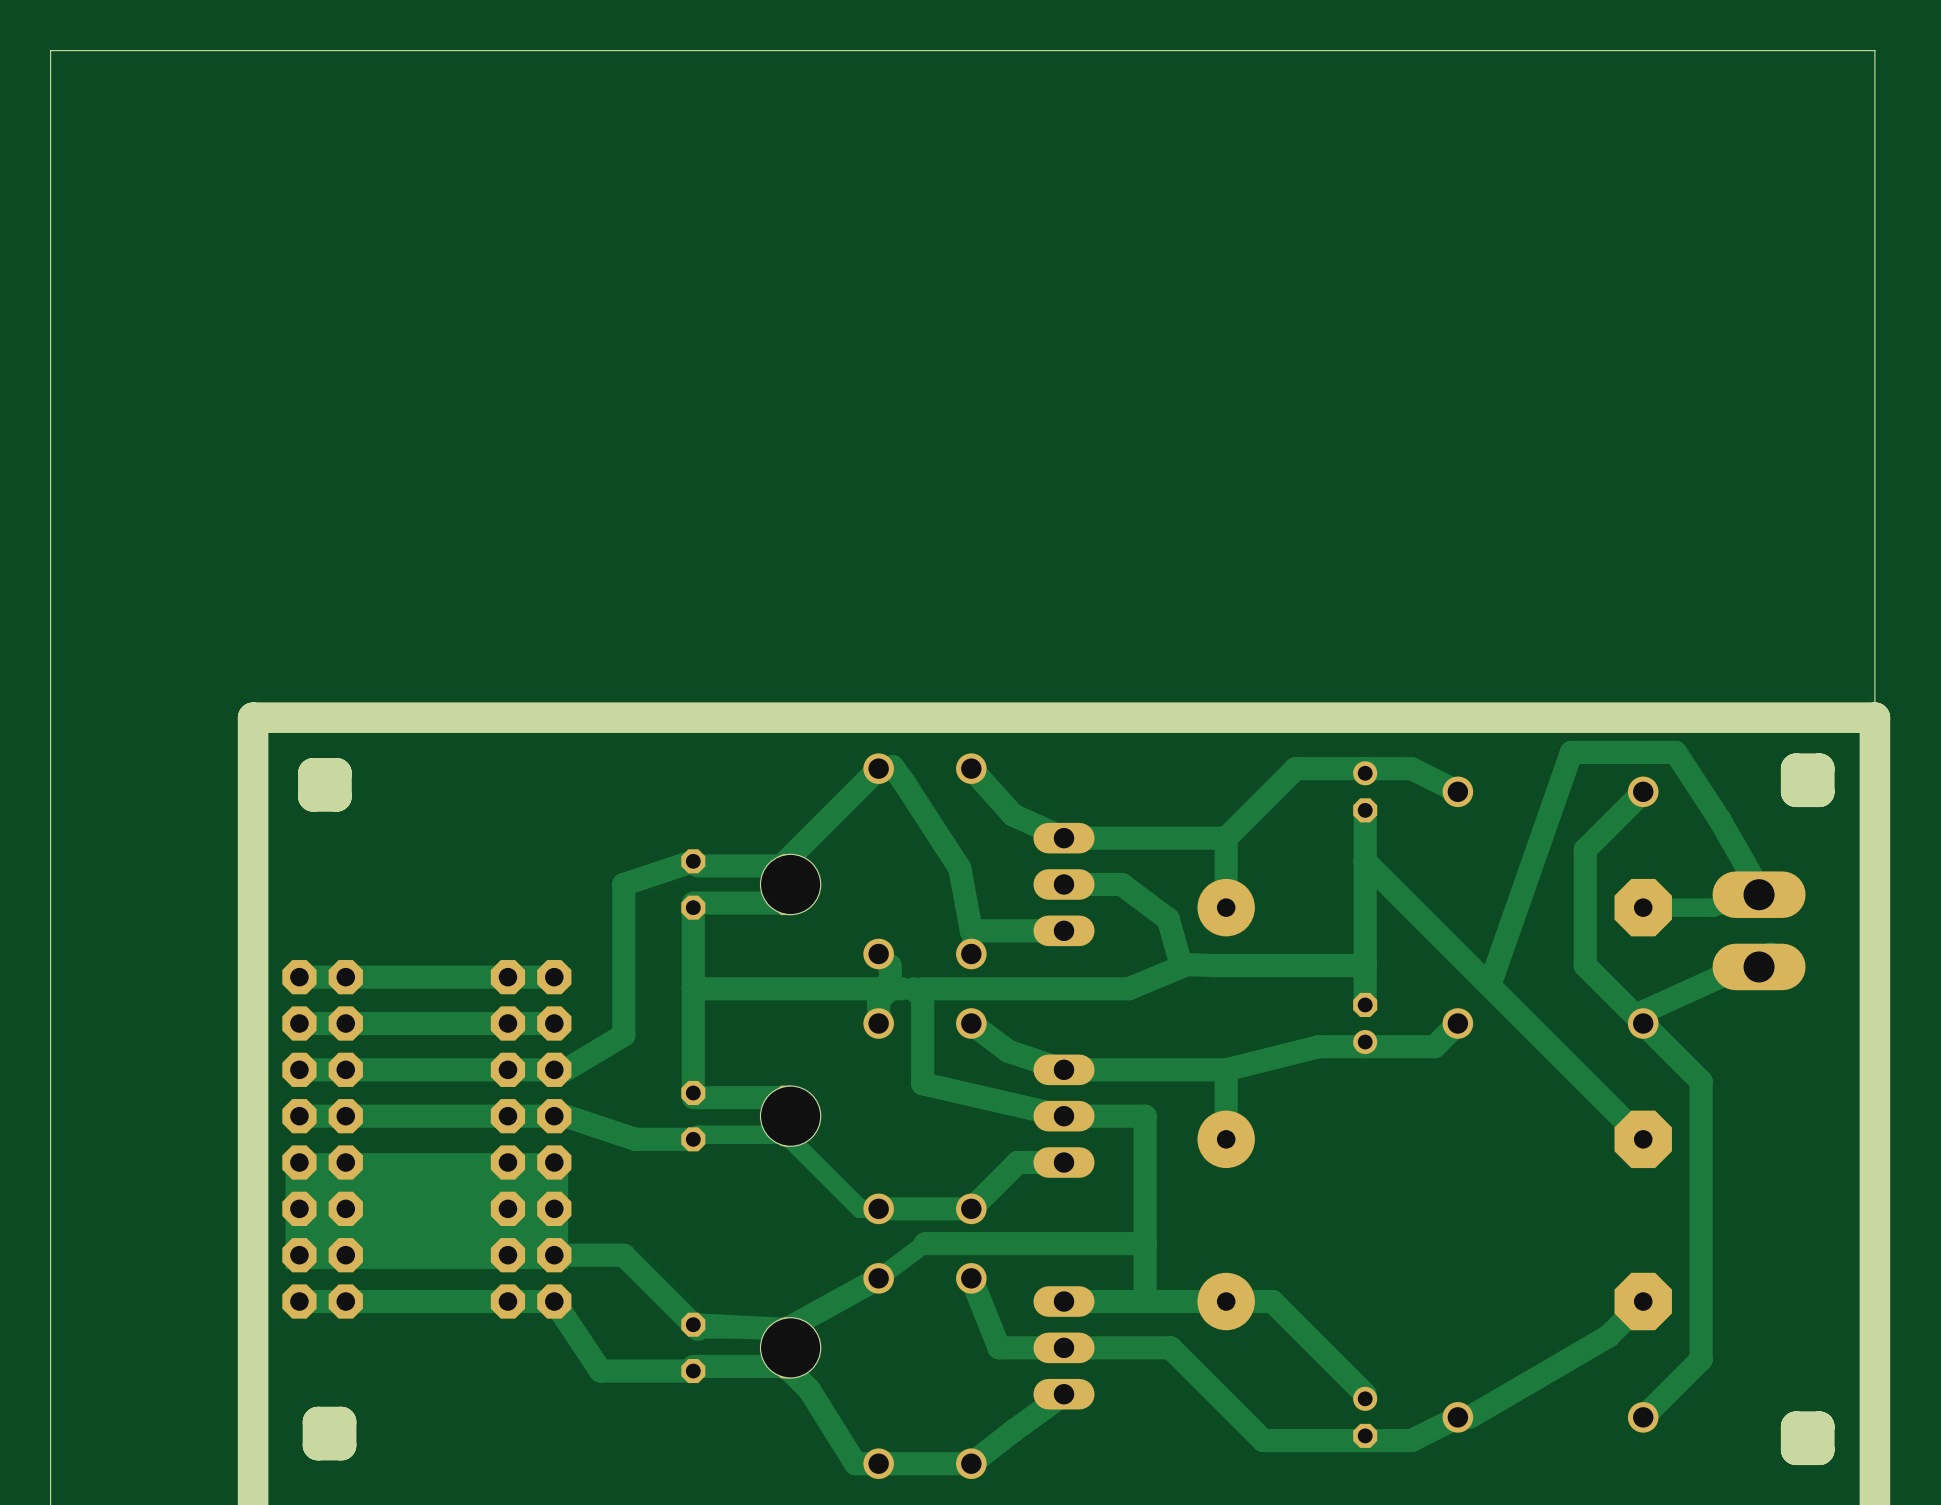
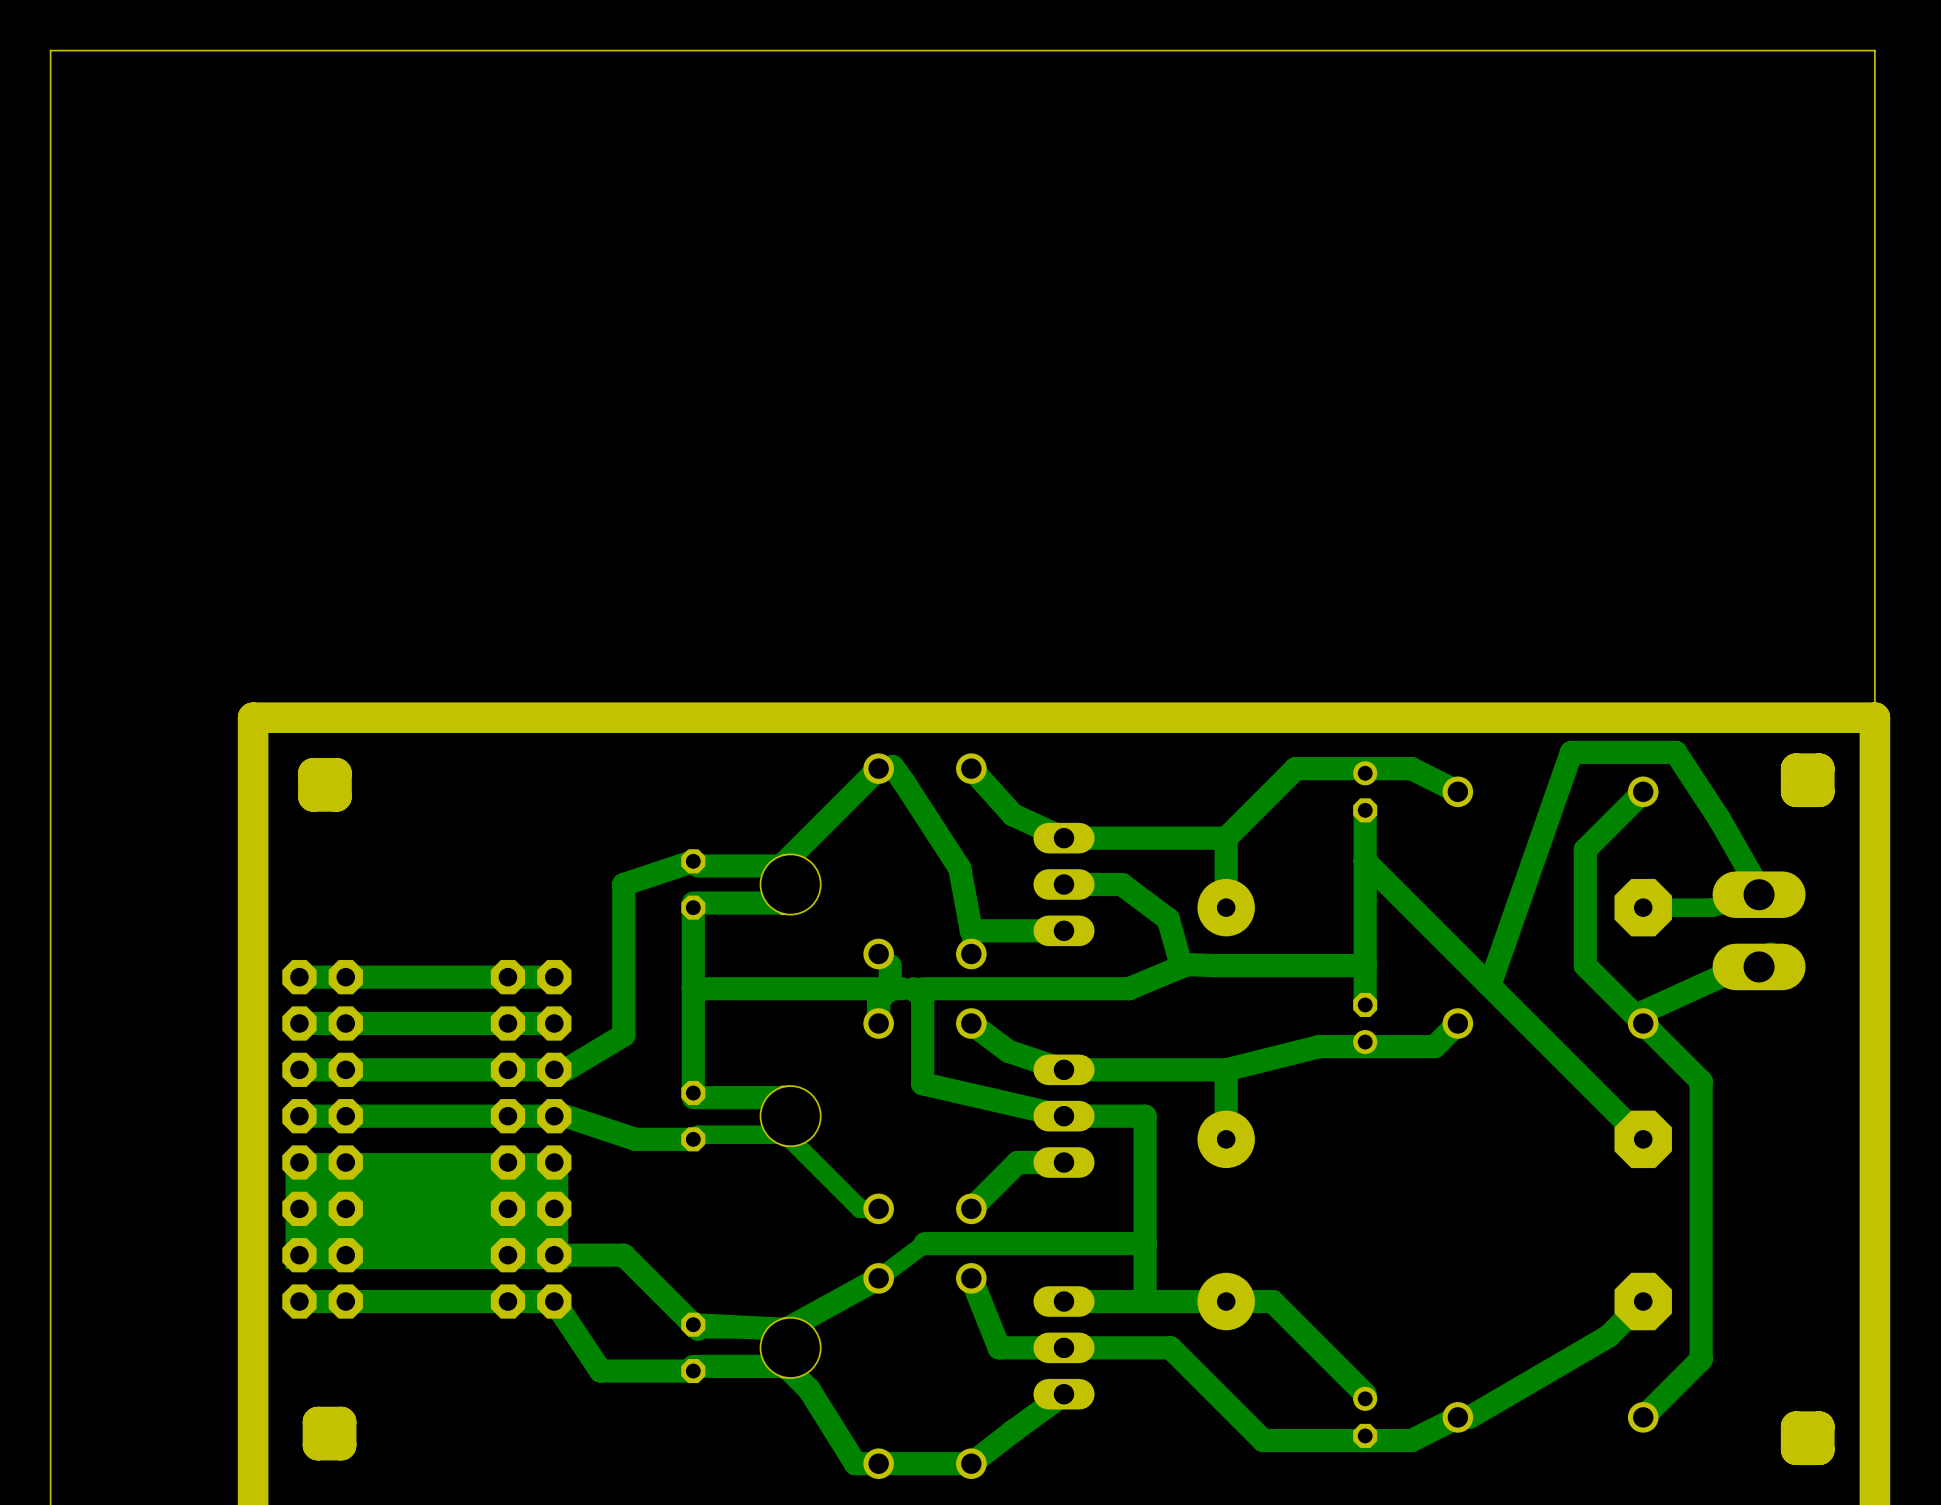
track: (971, 1208) (878, 1208) -> none

